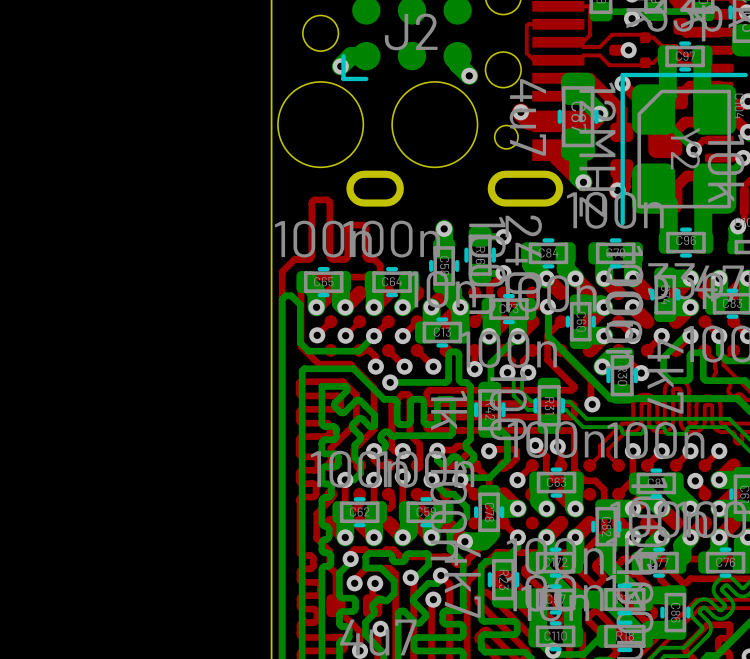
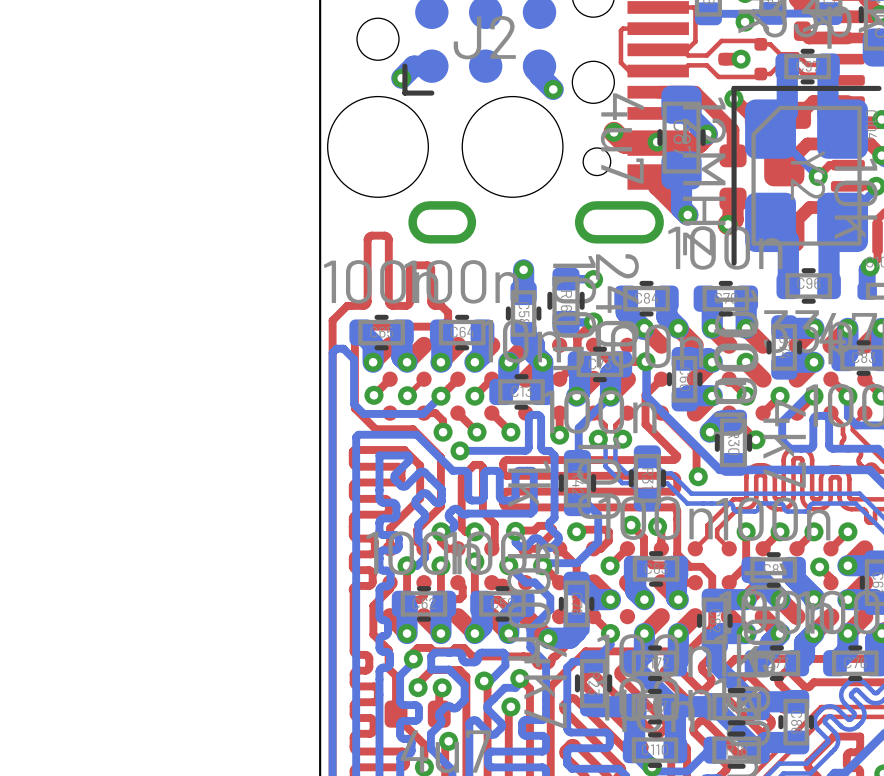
via: none -> (657, 142)

